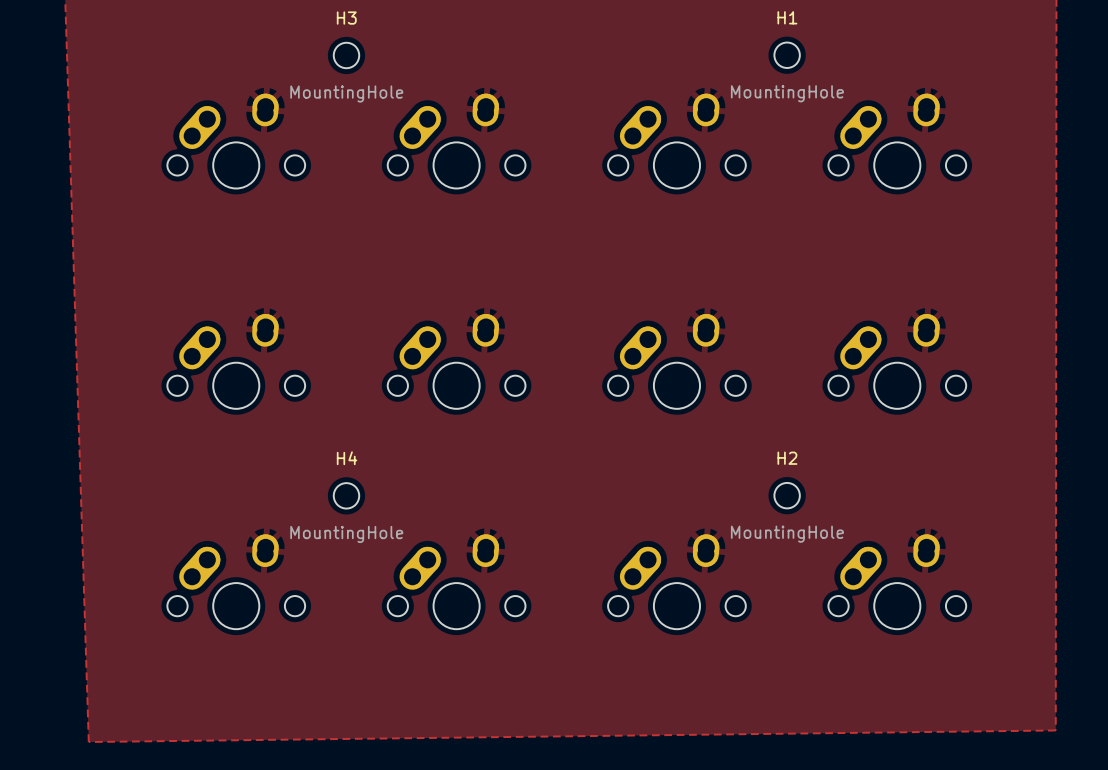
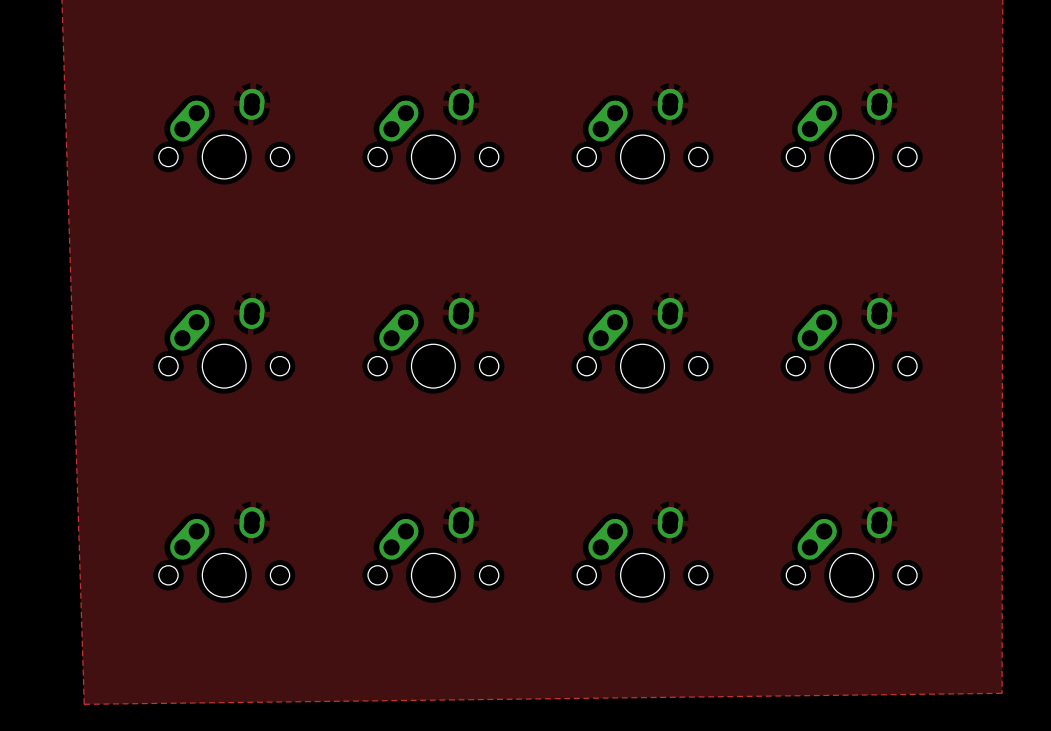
H3: MountingHole (346, 55) -> none
H1: MountingHole (787, 55) -> none
H4: MountingHole (346, 495) -> none
H2: MountingHole (787, 495) -> none

